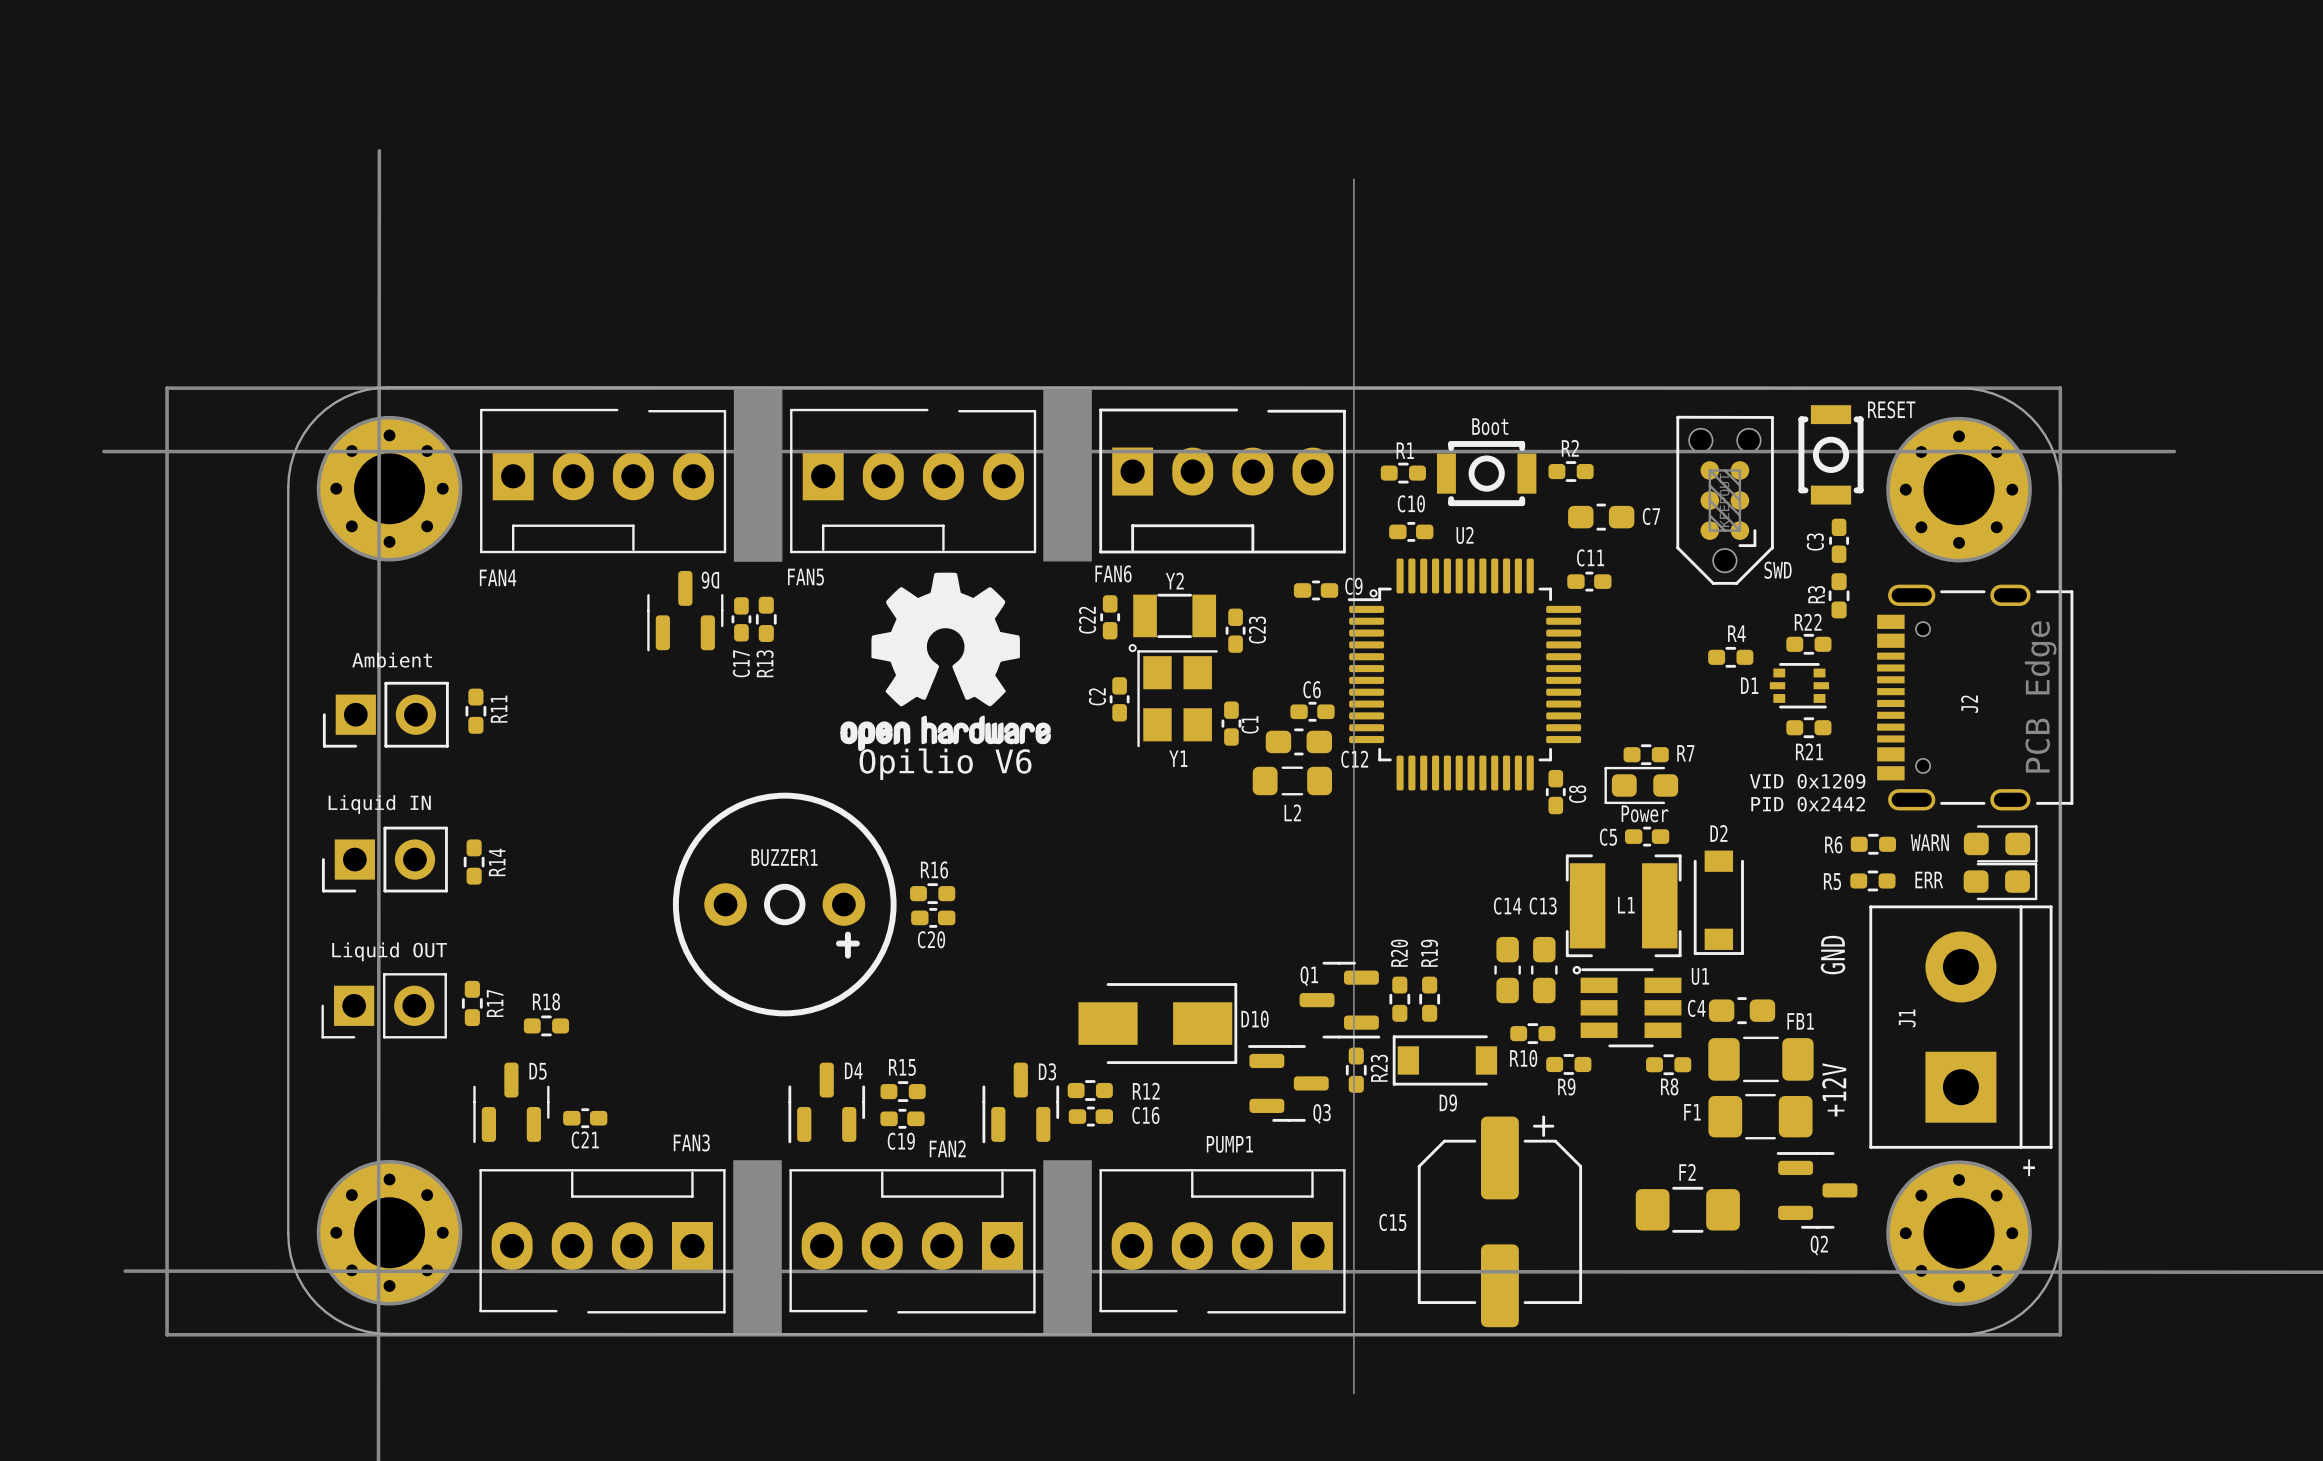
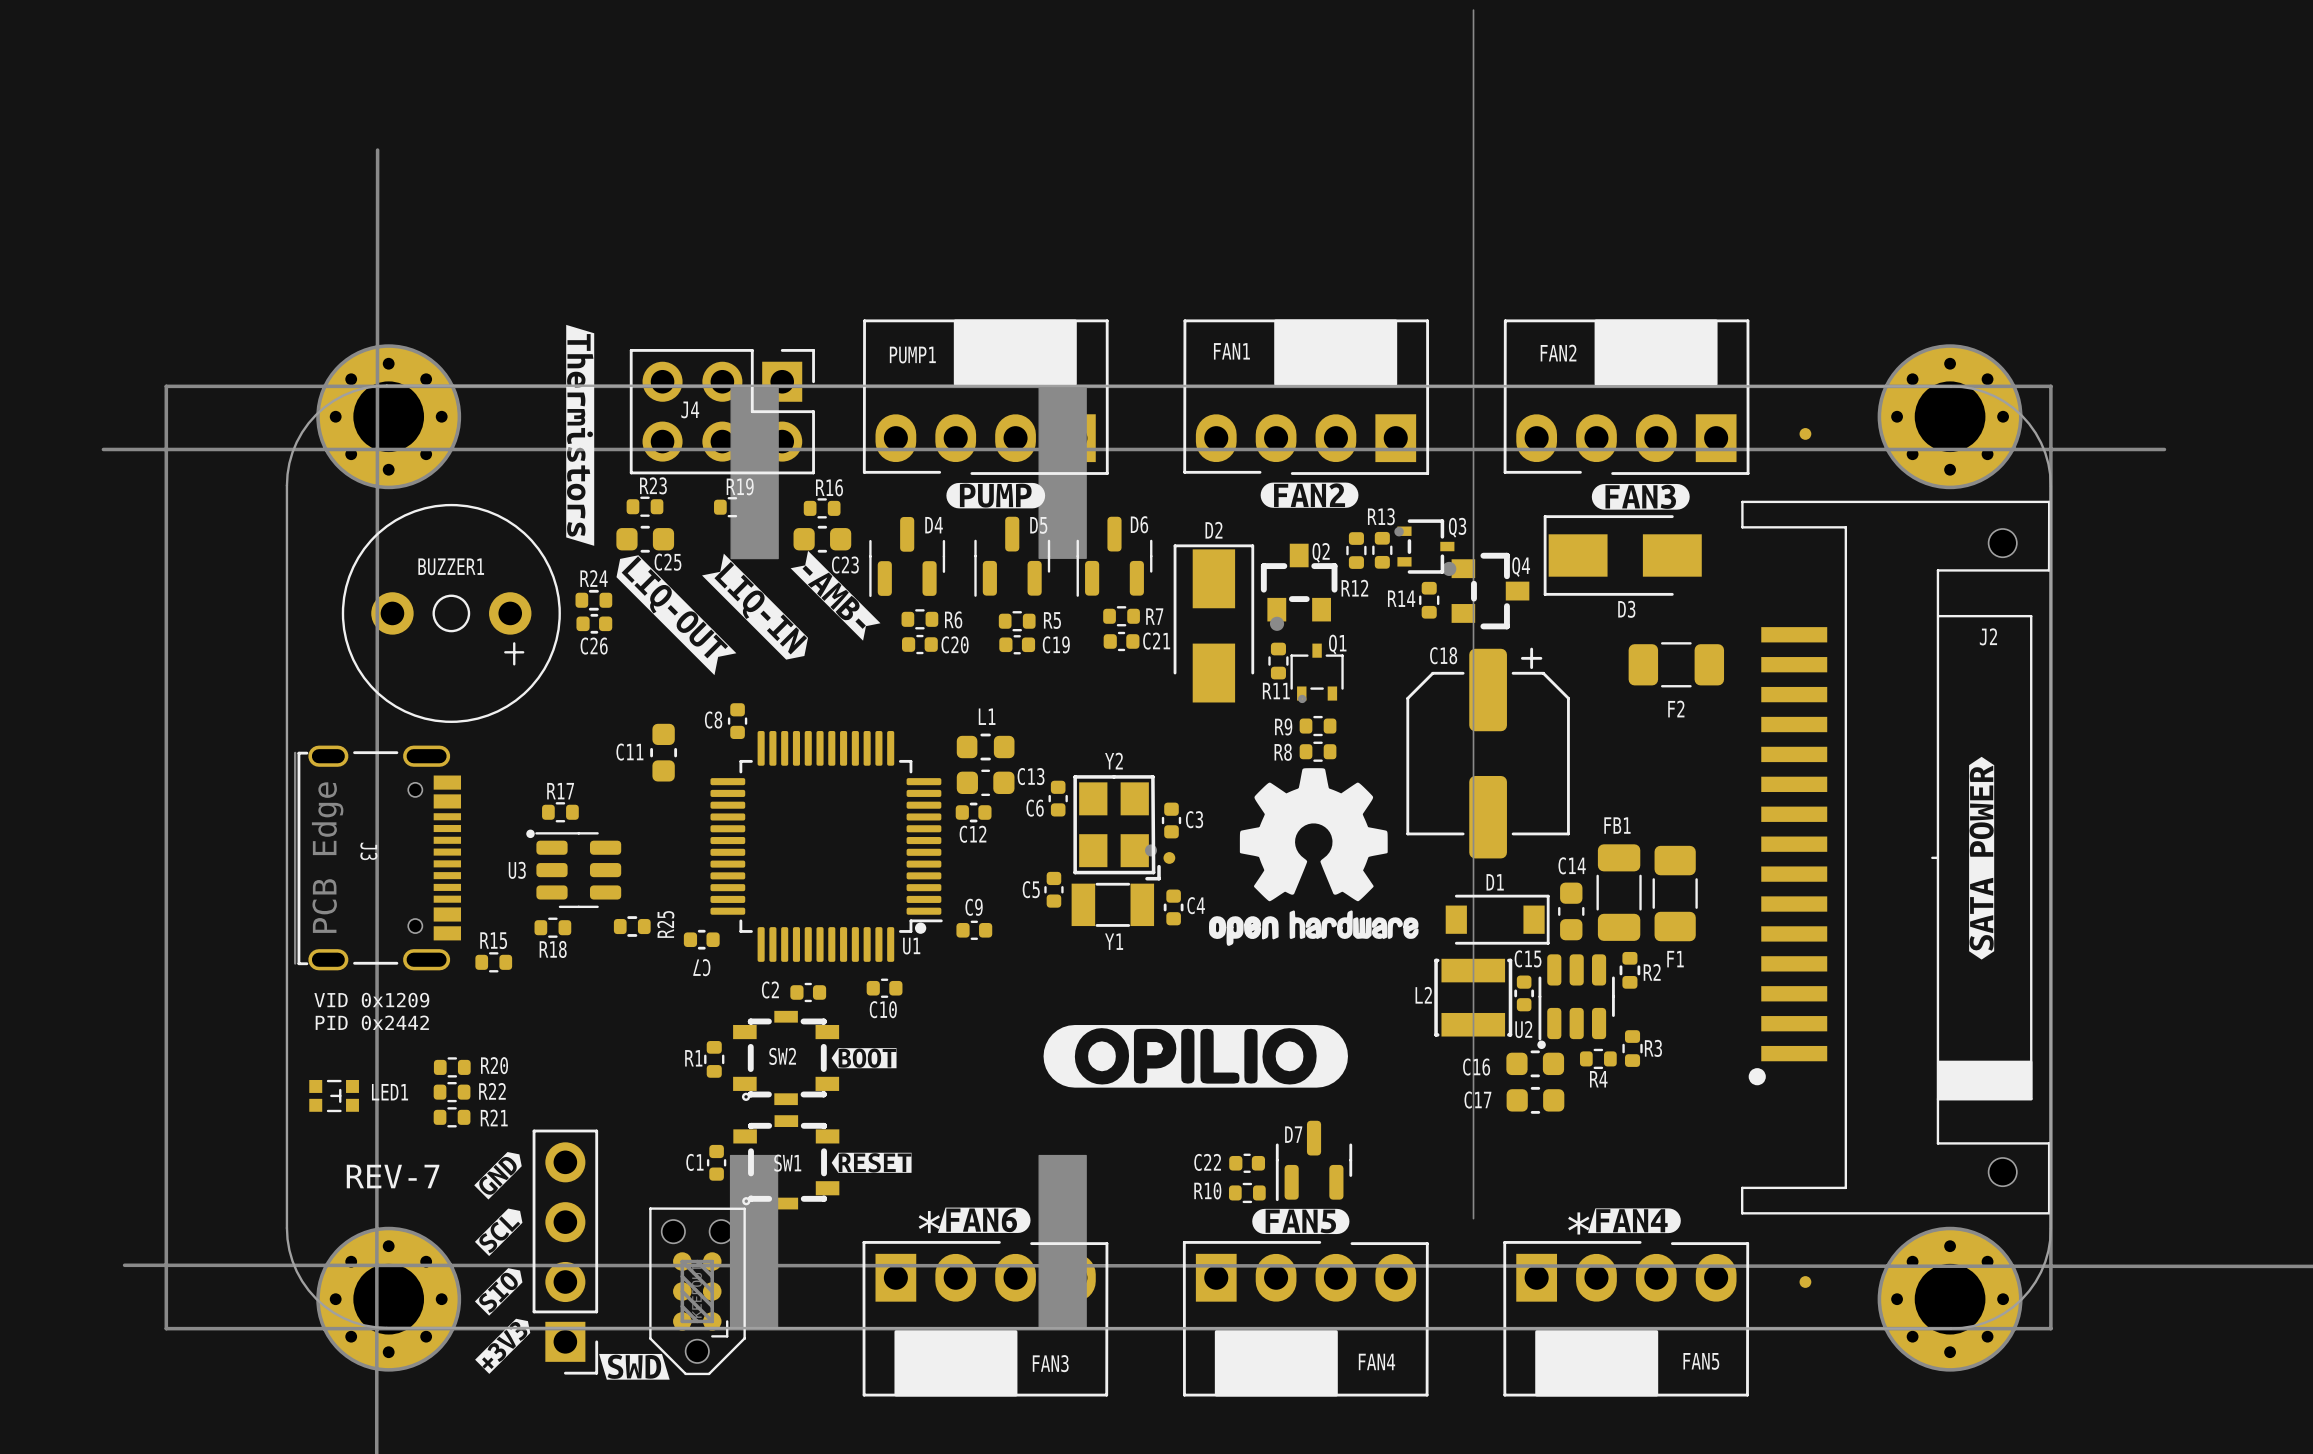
line: (1353, 179) (1353, 1393) -> (1473, 10) (1473, 1218)
drawing: none -> [566, 324, 881, 676]
FAN1: none -> (1306, 397)
FAN4 footprint: [480, 408, 727, 554] -> [1182, 1241, 1429, 1397]
FAN5 footprint: [790, 408, 1037, 554] -> [1503, 1241, 1750, 1397]
J4: none -> (722, 411)
part: none -> (1805, 433)
part: (1831, 454) -> none
R2 footprint: [1548, 461, 1594, 482] -> [1619, 951, 1641, 989]
R1 footprint: [1380, 462, 1426, 484] -> [704, 1041, 725, 1078]
part: (1486, 473) -> none
FAN6: (1222, 481) -> none
drawing: none -> [1260, 482, 1359, 508]
drawing: none -> [946, 482, 1046, 509]
drawing: none -> [1591, 483, 1690, 510]
part position: (389, 488) -> (388, 416)
part position: (1959, 489) -> (1950, 416)
part: (1725, 500) -> none
C10 name position: C10 (1411, 503) -> C10 (883, 1009)
C7 footprint: [1568, 503, 1635, 531] -> [683, 929, 720, 950]
C7 name position: C7 (1651, 516) -> C7 (701, 967)
C3 footprint: [1829, 518, 1850, 563] -> [1161, 802, 1182, 839]
C10 footprint: [1389, 521, 1434, 542] -> [866, 978, 903, 998]
U2 name position: U2 (1465, 535) -> U2 (1523, 1029)
C25: none -> (645, 539)
U2 footprint: [1347, 558, 1582, 791] -> [1538, 954, 1615, 1041]
C11 footprint: [1567, 571, 1612, 592] -> [650, 723, 678, 782]
R3 footprint: [1828, 573, 1850, 619] -> [1622, 1030, 1643, 1067]
FAN4 name position: FAN4 (498, 577) -> FAN4 (1376, 1361)
FAN5 name position: FAN5 (805, 577) -> FAN5 (1701, 1361)
D6 name rotation: 0° (710, 580) -> 180° (1139, 524)
C9 footprint: [1293, 580, 1339, 601] -> [956, 920, 993, 940]
J2 footprint: [1877, 584, 2074, 811] -> [1741, 500, 2051, 1215]
drawing: [1369, 589, 1378, 598] -> none
Y2 footprint: [1133, 593, 1217, 639] -> [1073, 775, 1161, 881]
Q4: none -> (1485, 591)
C22 footprint: [1100, 595, 1121, 640] -> [1229, 1153, 1266, 1173]
R13 footprint: [755, 596, 777, 642] -> [1372, 531, 1393, 569]
C17 footprint: [731, 597, 752, 642] -> [1506, 1086, 1565, 1114]
R24: none -> (593, 600)
C23 footprint: [1225, 608, 1246, 653] -> [793, 525, 852, 553]
D6 position: (685, 611) -> (1114, 556)
C26: none -> (594, 623)
R22 footprint: [1786, 633, 1832, 655] -> [433, 1082, 471, 1103]
drawing: [1128, 644, 1137, 653] -> none
R4 footprint: [1708, 646, 1754, 668] -> [1579, 1048, 1617, 1070]
Y1 footprint: [1137, 650, 1218, 748] -> [1071, 882, 1155, 927]
text: Ambient (392, 660) -> none
drawing position: (945, 661) -> (1313, 857)
C17 name position: C17 (741, 663) -> C17 (1477, 1100)
R13 name position: R13 (765, 663) -> R13 (1381, 516)
D1 footprint: [1769, 663, 1830, 709] -> [1445, 894, 1550, 945]
C2 footprint: [1109, 677, 1130, 722] -> [790, 982, 827, 1003]
D1 name position: D1 (1749, 685) -> D1 (1495, 882)
R11 footprint: [465, 688, 487, 734] -> [1268, 642, 1289, 680]
C1 footprint: [1221, 701, 1242, 746] -> [706, 1144, 727, 1181]
C6 footprint: [1290, 701, 1335, 722] -> [1048, 780, 1068, 817]
J2 name position: J2 (1969, 704) -> J2 (1988, 636)
part: (385, 714) -> none
R21 footprint: [1786, 717, 1832, 739] -> [433, 1107, 471, 1128]
C12 footprint: [1265, 728, 1333, 756] -> [955, 802, 992, 823]
R7 footprint: [1623, 744, 1669, 766] -> [1103, 606, 1140, 627]
R21 name position: R21 (1809, 751) -> R21 (494, 1117)
C18: none -> (1488, 753)
C12 name position: C12 (1354, 759) -> C12 (973, 834)
drawing: none -> [1969, 756, 1995, 960]
text: Opilio V6 (945, 764) -> none
L2 footprint: [1252, 766, 1333, 796] -> [1434, 958, 1513, 1037]
C8 footprint: [1545, 769, 1566, 815] -> [727, 703, 748, 740]
text: VID 0x1209 (1807, 781) -> none
part: (1641, 785) -> none
BUZZER1 footprint: [672, 792, 897, 1017] -> [341, 503, 561, 723]
text: Liquid IN (379, 804) -> none
text: PID 0x2442 (1808, 804) -> none
L2 name position: L2 (1292, 812) -> L2 (1423, 995)
C5 footprint: [1625, 826, 1670, 847] -> [1044, 871, 1064, 908]
drawing: none -> [526, 829, 535, 839]
R6 footprint: [1850, 833, 1896, 855] -> [901, 609, 939, 630]
R14 footprint: [463, 839, 485, 885] -> [1419, 581, 1440, 619]
part: (2000, 843) -> none
R6 name position: R6 (1833, 844) -> R6 (953, 619)
D2 footprint: [1693, 850, 1744, 955] -> [1173, 544, 1255, 703]
L1 footprint: [1565, 854, 1682, 958] -> [956, 733, 1015, 761]
part: (384, 859) -> none
J3: none -> (377, 857)
part: none -> (1169, 857)
R14 name position: R14 (497, 862) -> R14 (1401, 598)
R5 footprint: [1850, 870, 1896, 892] -> [998, 611, 1036, 632]
U3: none -> (578, 870)
R5 name position: R5 (1832, 881) -> R5 (1052, 620)
part: (2000, 881) -> none
R16 footprint: [910, 883, 956, 905] -> [803, 498, 841, 519]
C13 name position: C13 (1543, 906) -> C13 (1031, 776)
C20 footprint: [911, 907, 956, 928] -> [902, 634, 938, 655]
drawing: none -> [914, 922, 927, 934]
R25: none -> (632, 926)
C14 footprint: [1494, 936, 1521, 1004] -> [1558, 882, 1585, 941]
C13 footprint: [1531, 936, 1558, 1004] -> [956, 769, 1015, 797]
text: Liquid OUT (389, 951) -> none
R20 name position: R20 (1399, 953) -> R20 (494, 1065)
text: GND (1832, 955) -> none
Q1 footprint: [1299, 961, 1381, 1039] -> [1290, 643, 1344, 704]
drawing: [1572, 965, 1582, 975] -> none
U1 footprint: [1580, 968, 1682, 1048] -> [710, 730, 943, 962]
Q1 name position: Q1 (1309, 976) -> Q1 (1337, 644)
R20 footprint: [1389, 976, 1411, 1022] -> [433, 1057, 471, 1078]
R19 footprint: [1419, 976, 1441, 1022] -> [714, 497, 751, 518]
U1 name position: U1 (1700, 976) -> U1 (911, 946)
R17 footprint: [461, 980, 483, 1027] -> [542, 802, 579, 823]
C4 footprint: [1708, 997, 1776, 1025] -> [1163, 889, 1184, 926]
text: none -> VID 0x1209 (371, 1000)
part: (384, 1005) -> none
C4 name position: C4 (1696, 1008) -> C4 (1196, 905)
R18 footprint: [523, 1015, 570, 1037] -> [534, 917, 572, 938]
FB1 name position: FB1 (1800, 1021) -> FB1 (1617, 825)
D10: (1157, 1023) -> none
R10 footprint: [1510, 1023, 1556, 1045] -> [1228, 1182, 1266, 1204]
text: none -> PID 0x2442 (372, 1022)
J1: (1960, 1027) -> none
drawing: none -> [1043, 1025, 1348, 1088]
FB1 footprint: [1708, 1036, 1814, 1083] -> [1596, 844, 1642, 941]
Q3 footprint: [1248, 1045, 1329, 1122] -> [1394, 519, 1455, 574]
drawing: none -> [1537, 1040, 1546, 1050]
R23 footprint: [1345, 1047, 1367, 1093] -> [626, 496, 664, 517]
drawing: none -> [831, 1048, 897, 1069]
R9 footprint: [1546, 1054, 1592, 1075] -> [1299, 715, 1337, 737]
R8 footprint: [1646, 1054, 1692, 1076] -> [1299, 741, 1337, 762]
D9: (1444, 1060) -> none
D4 footprint: [788, 1062, 866, 1144] -> [869, 516, 946, 598]
SW2: none -> (786, 1057)
D3 footprint: [982, 1062, 1060, 1144] -> [1543, 515, 1702, 596]
D3 name position: D3 (1047, 1071) -> D3 (1626, 609)
R12 footprint: [1067, 1080, 1113, 1101] -> [1346, 532, 1367, 569]
R15 footprint: [880, 1081, 926, 1103] -> [475, 952, 513, 973]
text: +12V (1834, 1089) -> none
R12 name position: R12 (1146, 1091) -> R12 (1354, 588)
F1 footprint: [1708, 1093, 1813, 1140] -> [1652, 845, 1698, 942]
LED1: none -> (334, 1096)
D5 position: (511, 1102) -> (1012, 556)
C16 footprint: [1068, 1106, 1113, 1127] -> [1506, 1050, 1565, 1078]
C21 footprint: [563, 1108, 608, 1129] -> [1103, 631, 1140, 652]
C19 footprint: [880, 1108, 925, 1129] -> [999, 635, 1036, 655]
F1 name position: F1 (1692, 1112) -> F1 (1675, 959)
Q3 name position: Q3 (1322, 1113) -> Q3 (1457, 527)
C16 name position: C16 (1145, 1115) -> C16 (1476, 1067)
C15 footprint: [1417, 1115, 1583, 1328] -> [1514, 975, 1535, 1012]
FAN3 name position: FAN3 (691, 1142) -> FAN3 (1050, 1363)
PUMP1 name position: PUMP1 (1229, 1144) -> PUMP1 (912, 355)
FAN2 name position: FAN2 (947, 1148) -> FAN2 (1558, 353)
Q2 footprint: [1776, 1152, 1858, 1229] -> [1260, 543, 1338, 631]
drawing: none -> [474, 1152, 531, 1374]
drawing: none -> [831, 1152, 912, 1173]
D7: none -> (1314, 1160)
SW1: none -> (786, 1162)
text: + (2029, 1167) -> none
FAN3 footprint: [479, 1169, 726, 1314] -> [862, 1241, 1109, 1397]
FAN2 footprint: [789, 1169, 1036, 1314] -> [1503, 319, 1750, 475]
PUMP1 footprint: [1099, 1169, 1346, 1314] -> [862, 319, 1109, 475]
F2 name position: F2 (1687, 1172) -> F2 (1676, 709)
text: none -> REV-7 (393, 1176)
F2 footprint: [1635, 1186, 1740, 1233] -> [1628, 642, 1725, 688]
drawing: none -> [937, 1207, 1031, 1233]
drawing: none -> [1587, 1208, 1681, 1234]
drawing: none -> [1252, 1208, 1350, 1235]
C15 name position: C15 (1392, 1222) -> C15 (1528, 958)
text: none -> * (929, 1222)
text: none -> * (1578, 1223)
part position: (389, 1232) -> (388, 1299)
part position: (1959, 1233) -> (1950, 1299)
Q2 name position: Q2 (1819, 1245) -> Q2 (1321, 552)
part: none -> (565, 1252)
part: none -> (1805, 1282)
part: none -> (697, 1291)
drawing: none -> [599, 1353, 670, 1380]

